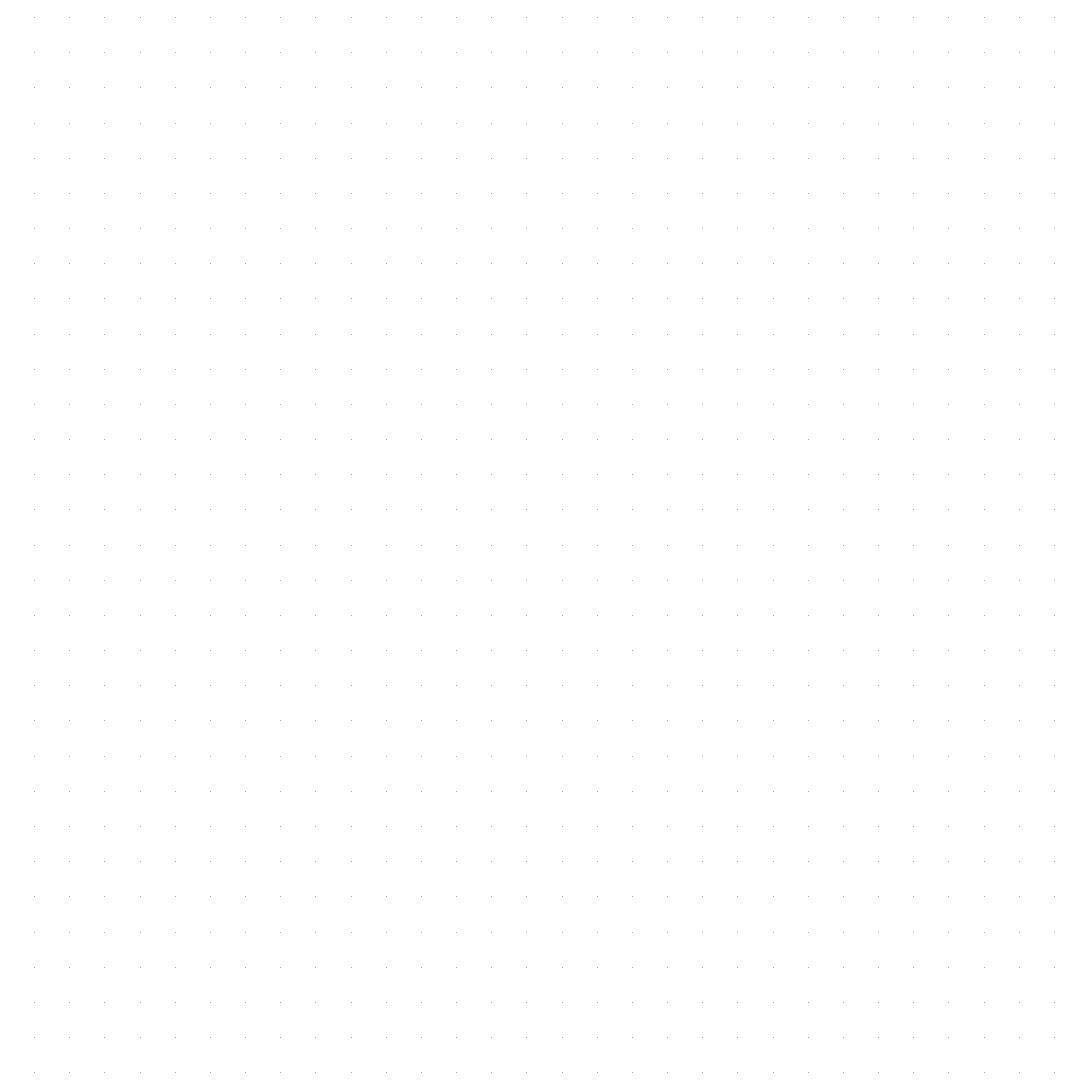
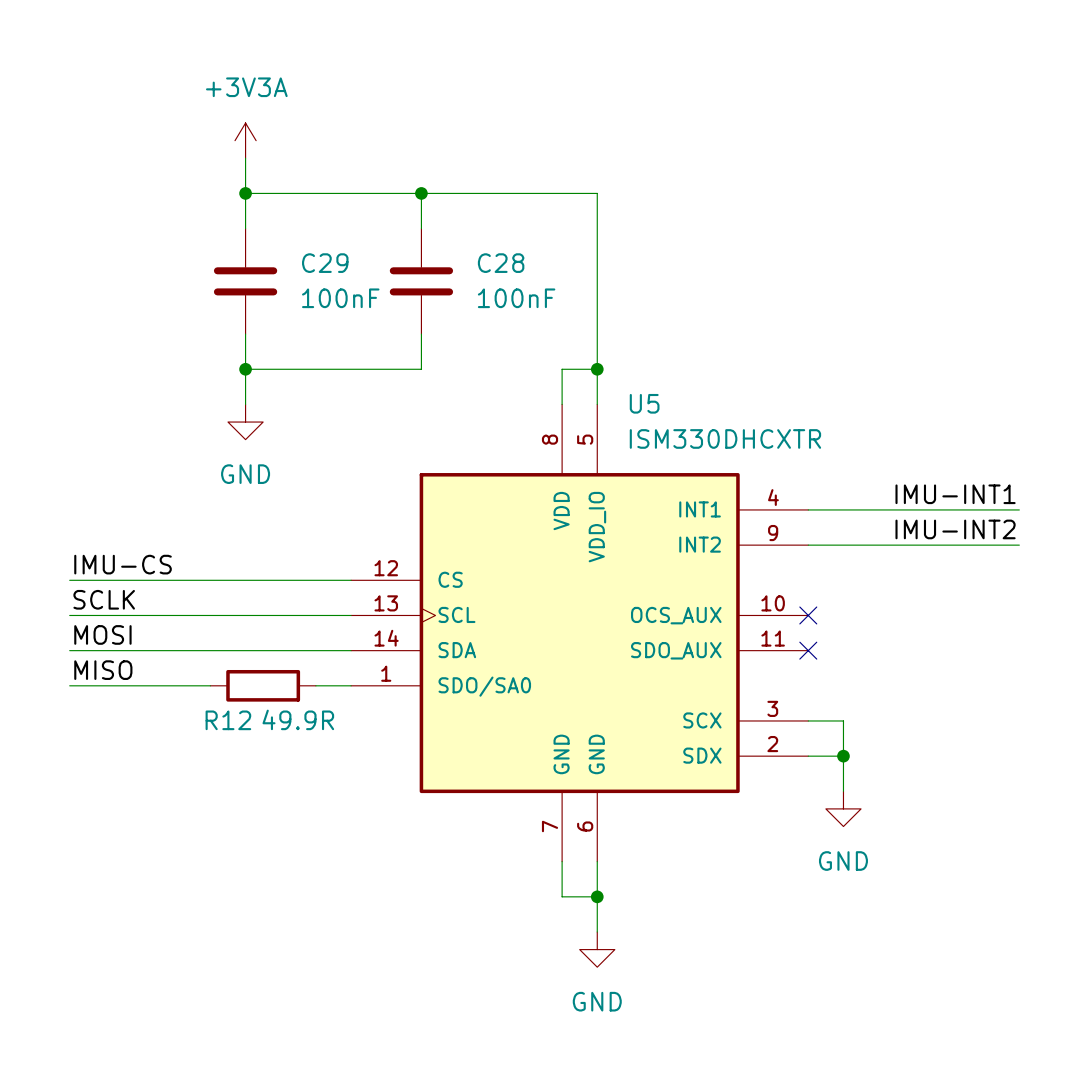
power symbol: none -> +3V3A (245, 140)
wire: none -> (245, 158) (245, 228)
wire: none -> (245, 193) (597, 193) (597, 404)
junction: none -> (245, 193)
wire: none -> (421, 193) (421, 228)
junction: none -> (421, 193)
C29: none -> 100nF (245, 281)
C28: none -> 100nF (421, 281)
wire: none -> (245, 334) (245, 404)
wire: none -> (421, 334) (421, 369) (245, 369)
junction: none -> (245, 369)
wire: none -> (597, 369) (562, 369) (562, 404)
junction: none -> (597, 369)
power symbol: none -> GND (245, 422)
label: none -> IMU-INT1 (955, 494)
wire: none -> (808, 509) (1019, 509)
label: none -> IMU-INT2 (955, 529)
wire: none -> (808, 545) (1019, 545)
label: none -> IMU-CS (123, 564)
wire: none -> (69, 580) (351, 580)
label: none -> SCLK (104, 599)
wire: none -> (69, 615) (351, 615)
no-connect mark: none -> (808, 615)
U5: none -> ISM330DHCXTR (579, 633)
label: none -> MOSI (102, 634)
wire: none -> (69, 650) (351, 650)
no-connect mark: none -> (808, 650)
label: none -> MISO (103, 670)
wire: none -> (69, 685) (210, 685)
R12: none -> 49.9R (263, 685)
wire: none -> (315, 685) (351, 685)
wire: none -> (808, 720) (843, 720) (843, 791)
wire: none -> (808, 756) (843, 756)
junction: none -> (843, 756)
power symbol: none -> GND (843, 808)
wire: none -> (562, 861) (562, 896) (597, 896)
wire: none -> (597, 861) (597, 932)
junction: none -> (597, 896)
power symbol: none -> GND (597, 949)

